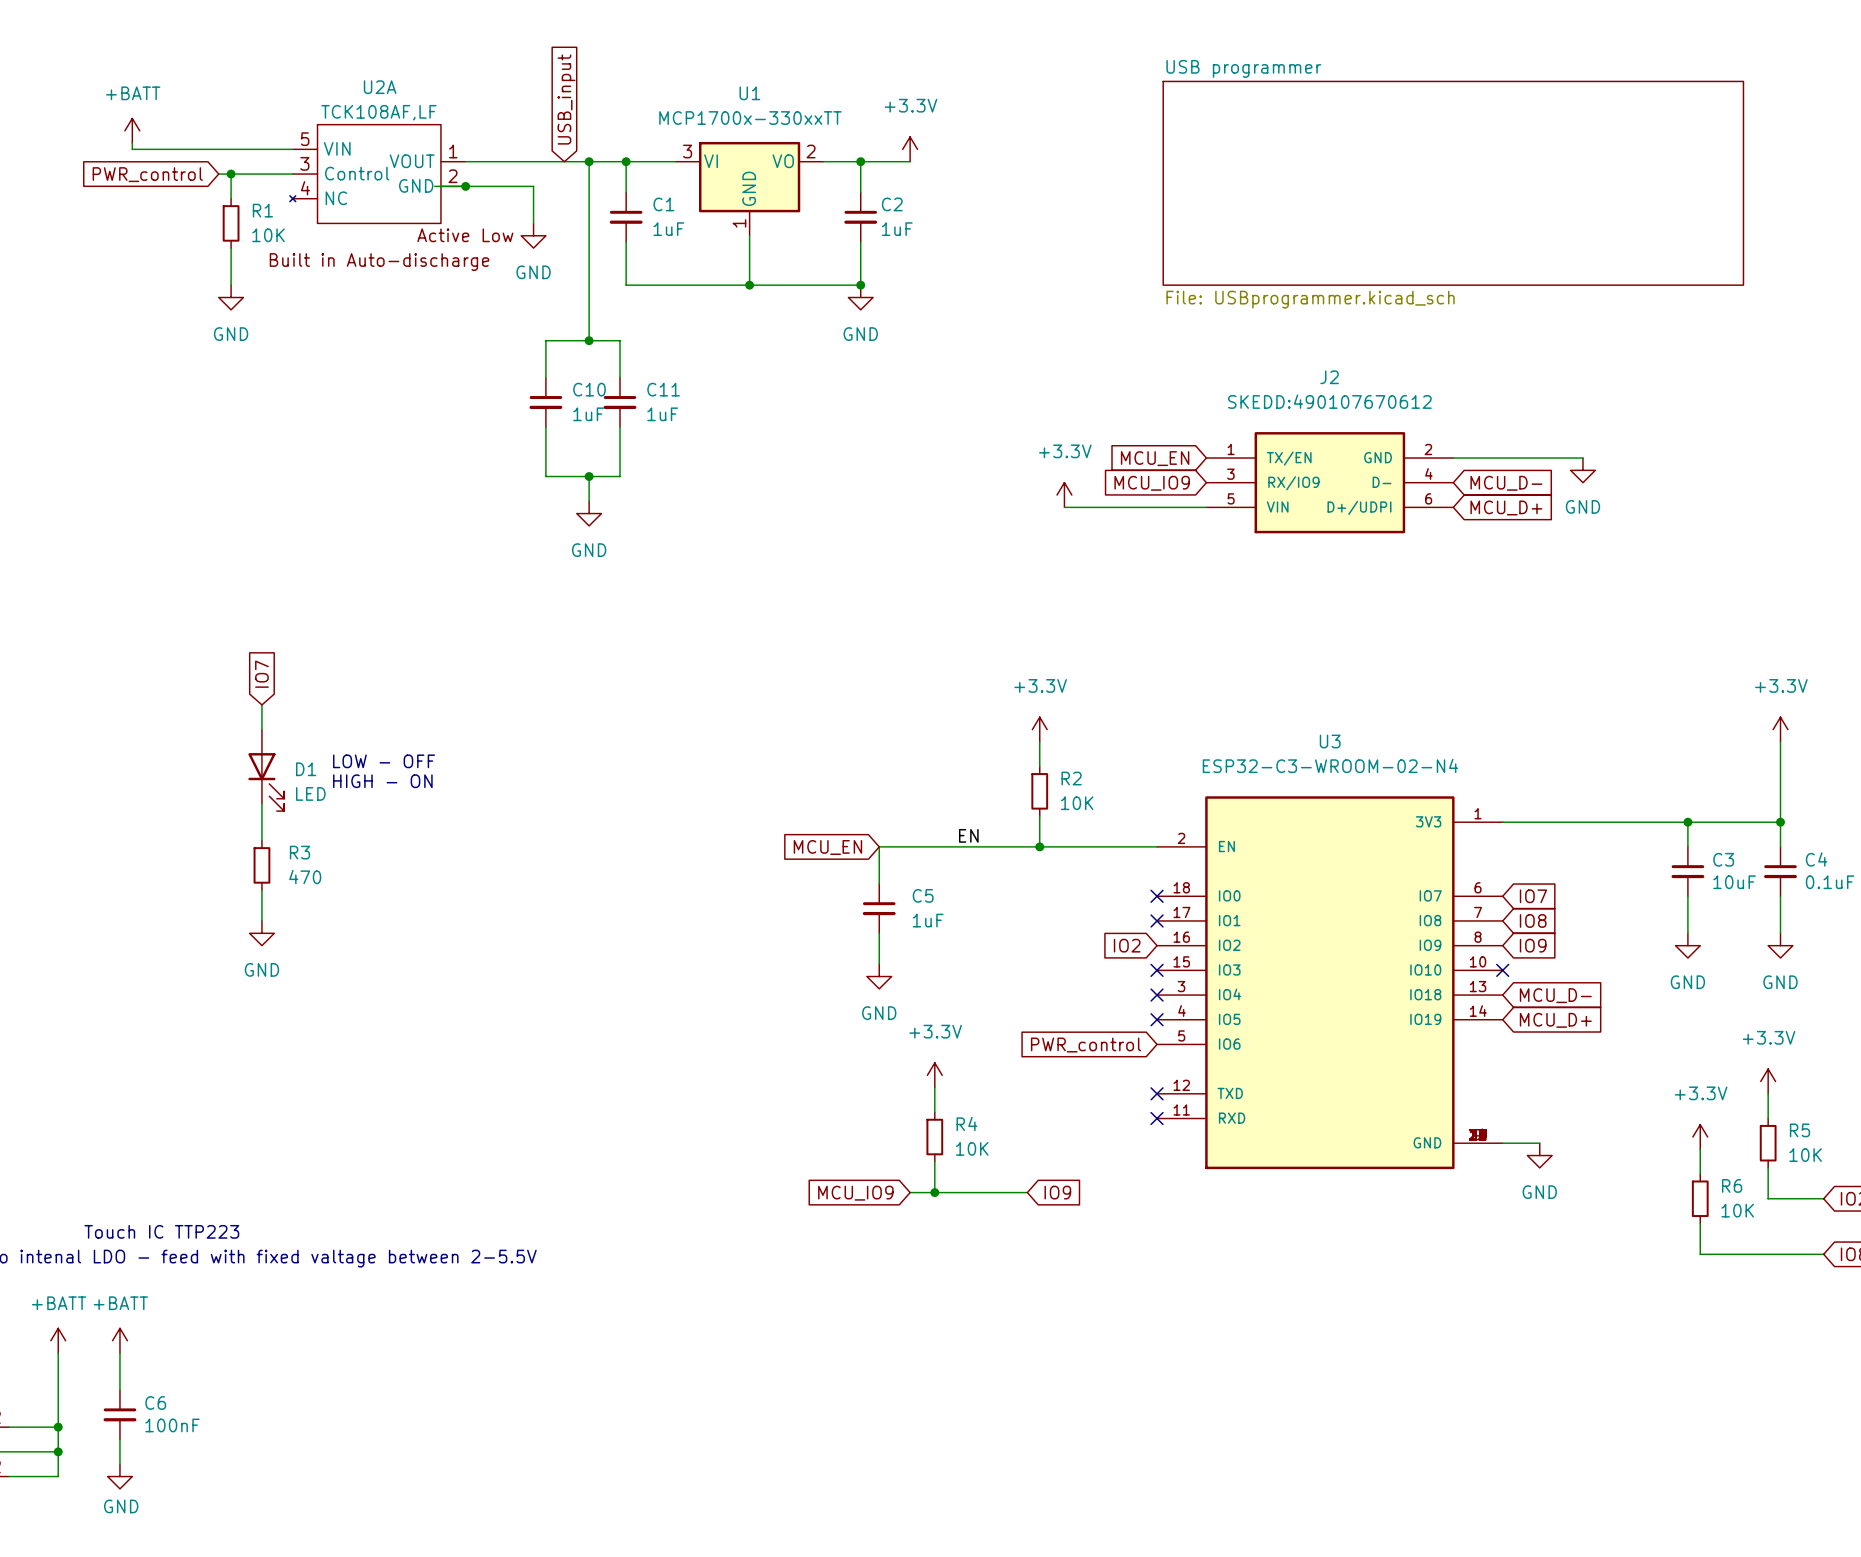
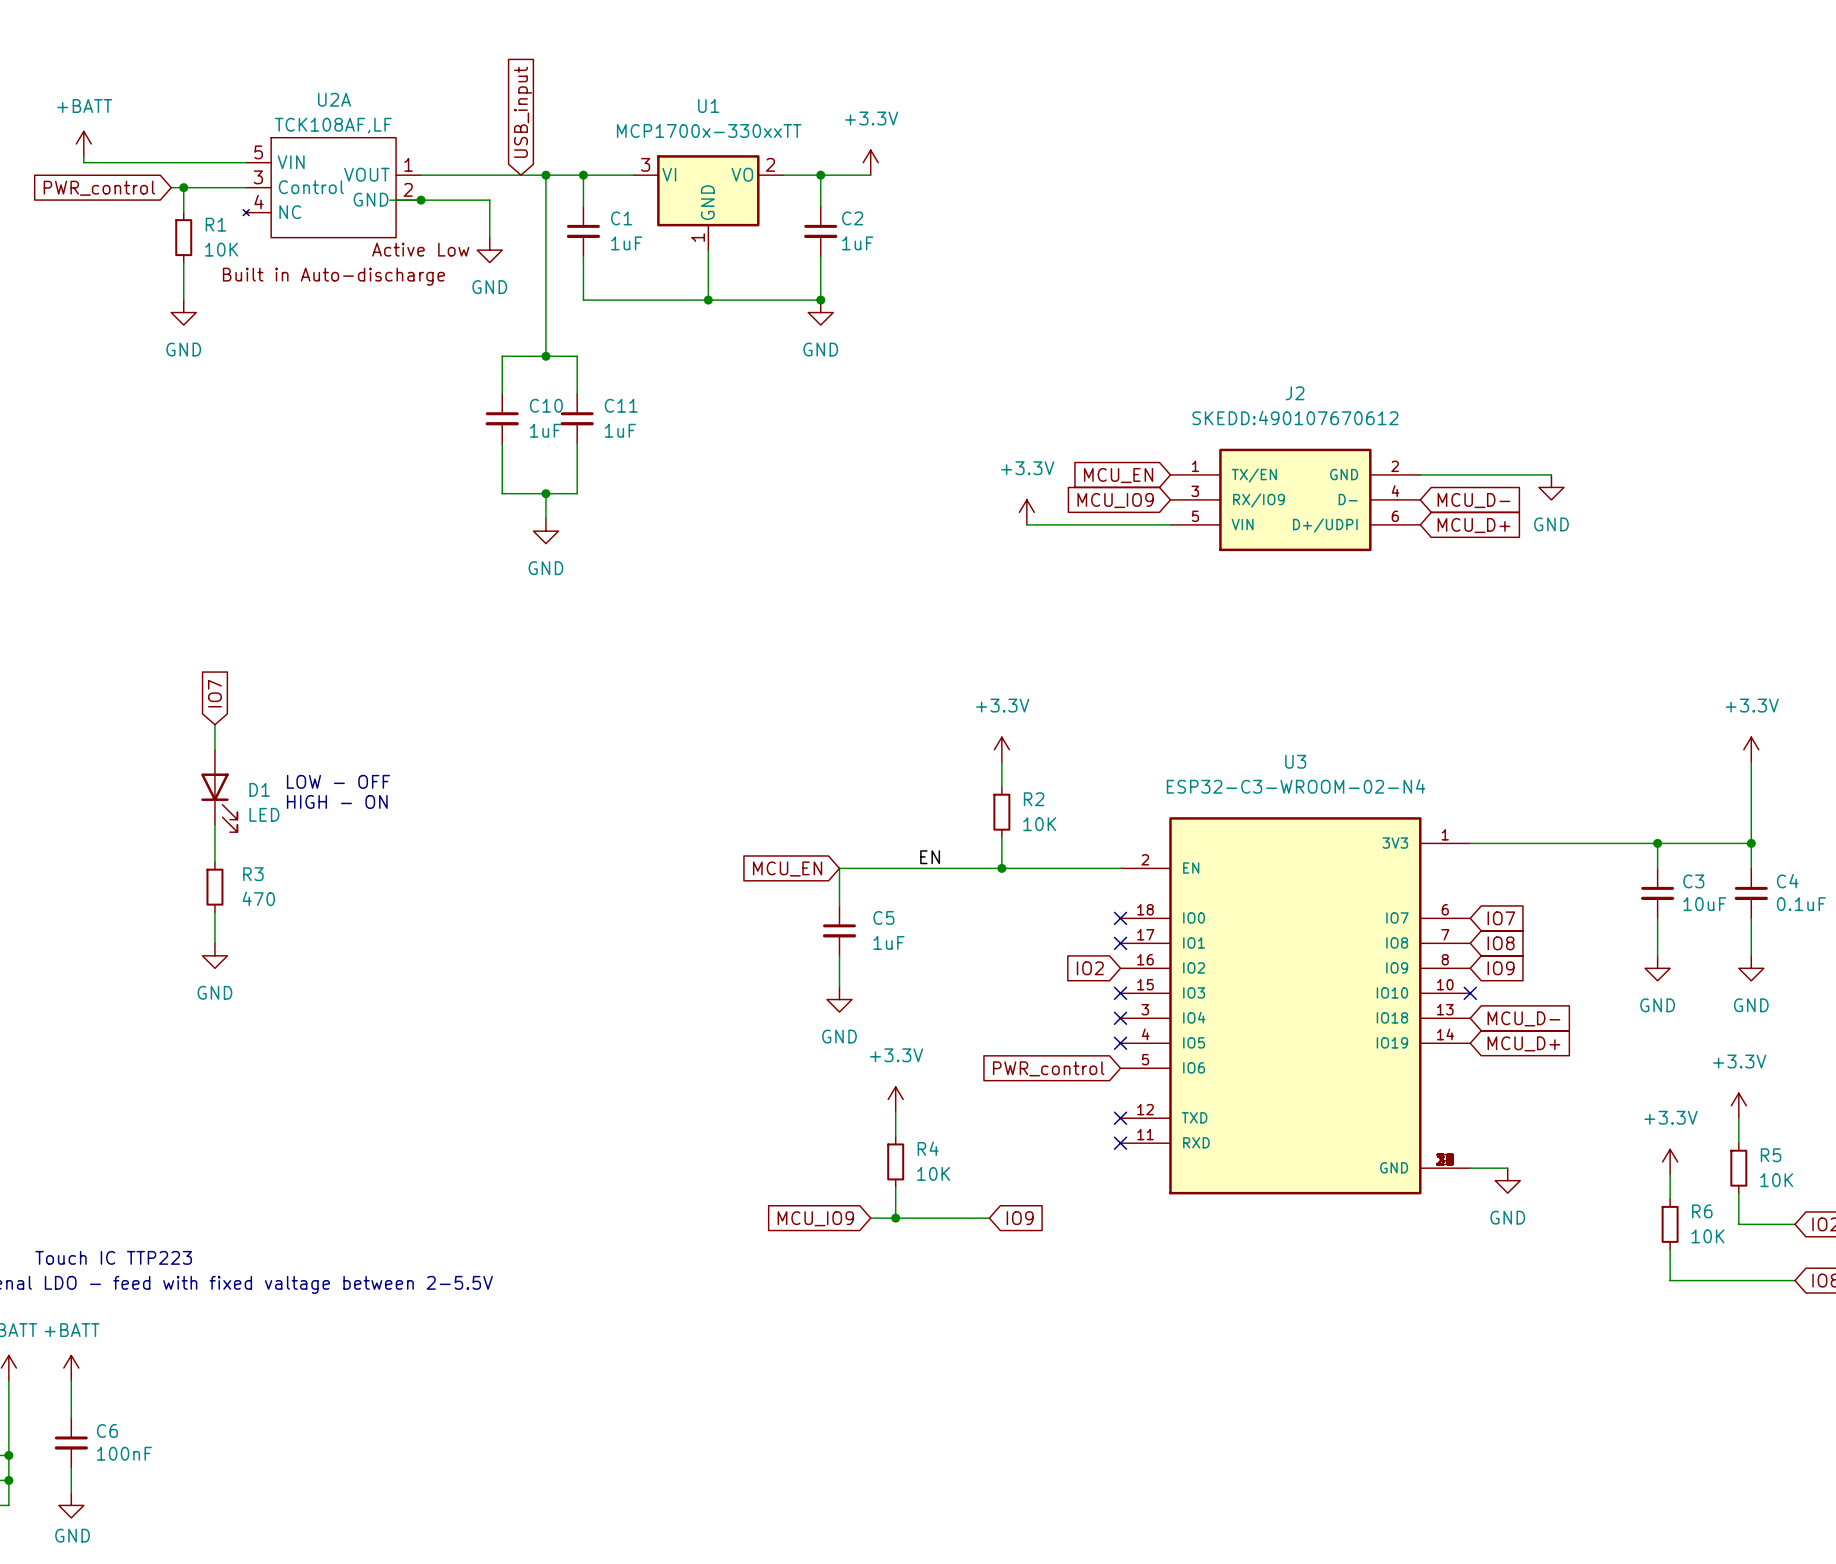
sheet USB programmer: File: USBprogrammer.kicad_sch (1453, 183) -> none

